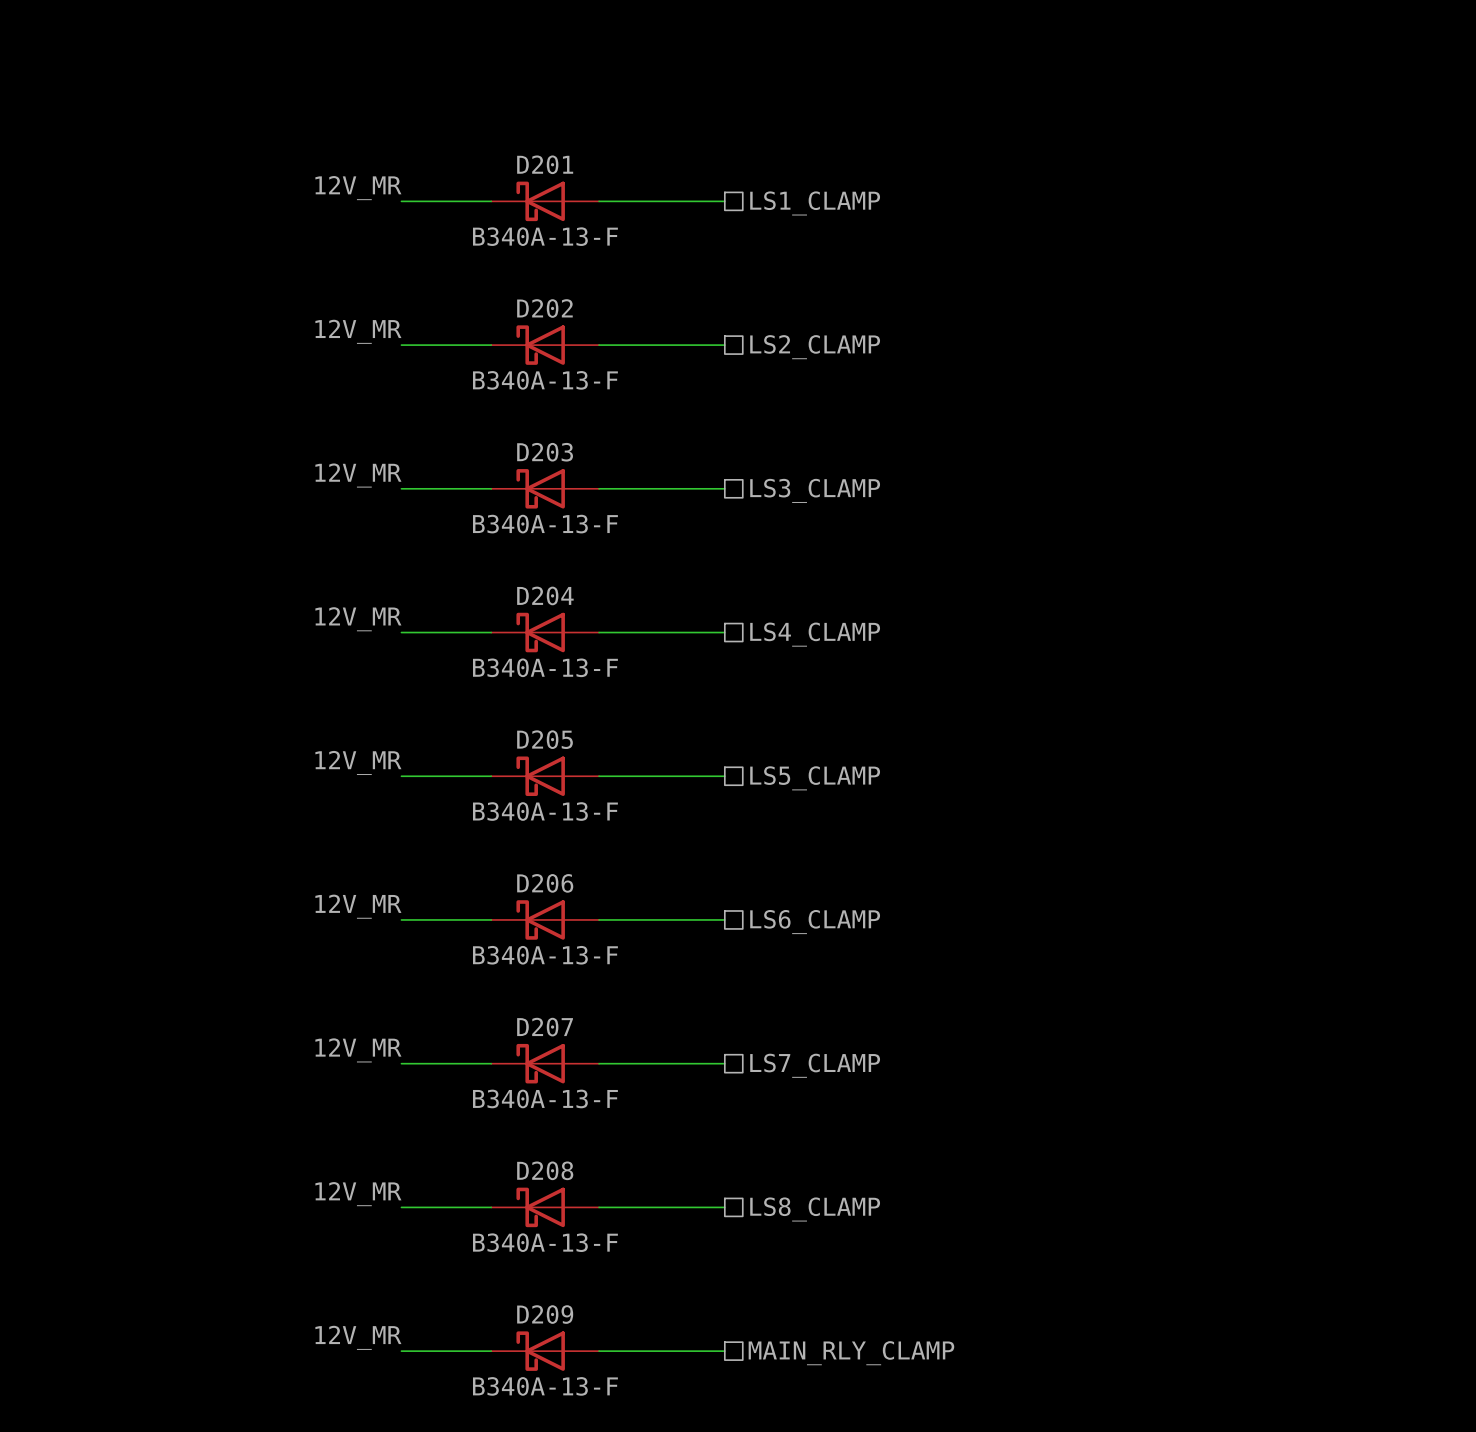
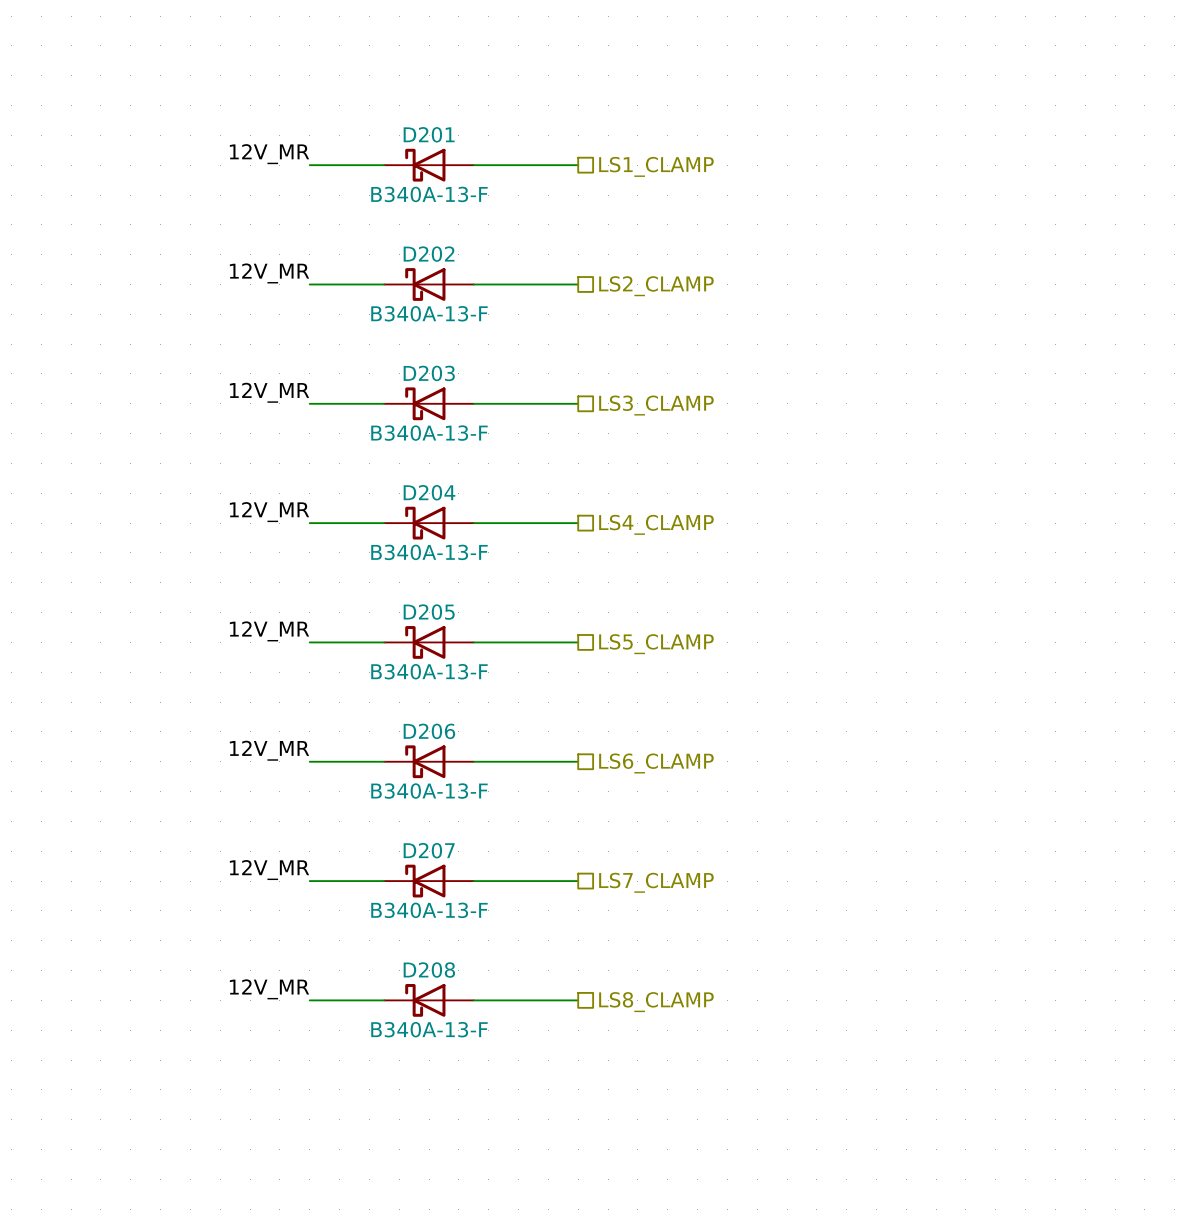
label: 12V_MR (358, 1337) -> none
wire: (401, 1351) (491, 1351) -> none
D209: B340A-13-F (545, 1351) -> none
wire: (599, 1351) (724, 1351) -> none
hierarchical label: MAIN_RLY_CLAMP (851, 1353) -> none

